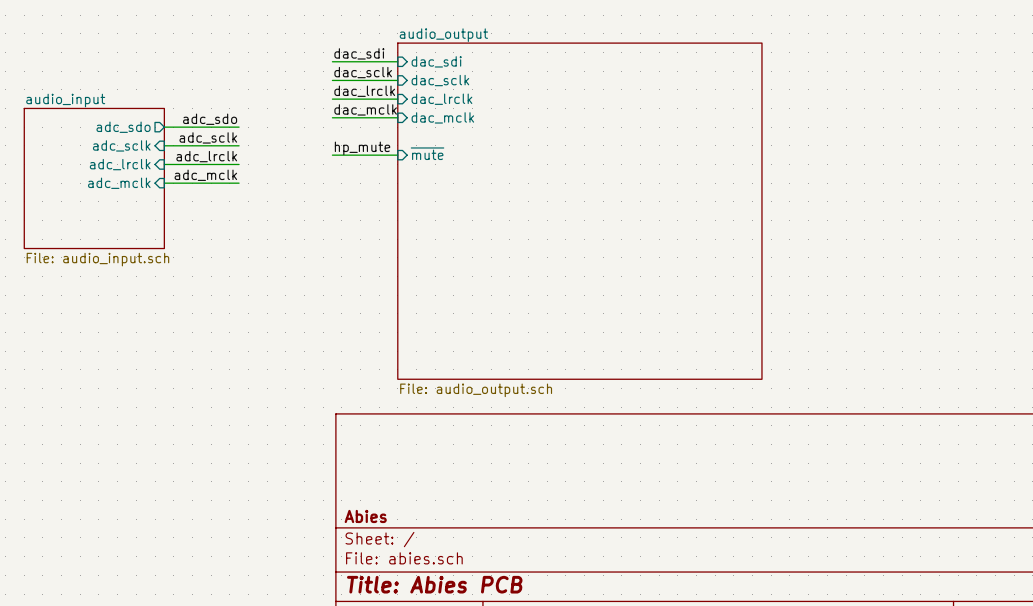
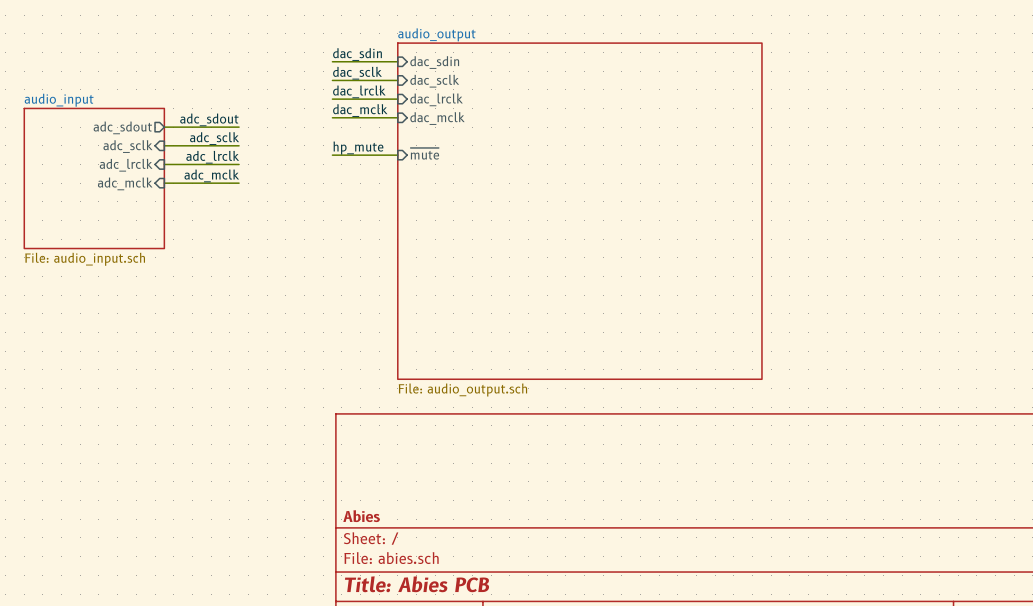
label: dac_sdi (359, 53) -> dac_sdin (357, 54)
sheet pin: dac_sdi (436, 61) -> dac_sdin (434, 62)
label: adc_sdo (210, 119) -> adc_sdout (209, 119)
sheet pin: adc_sdo (123, 127) -> adc_sdout (122, 127)

